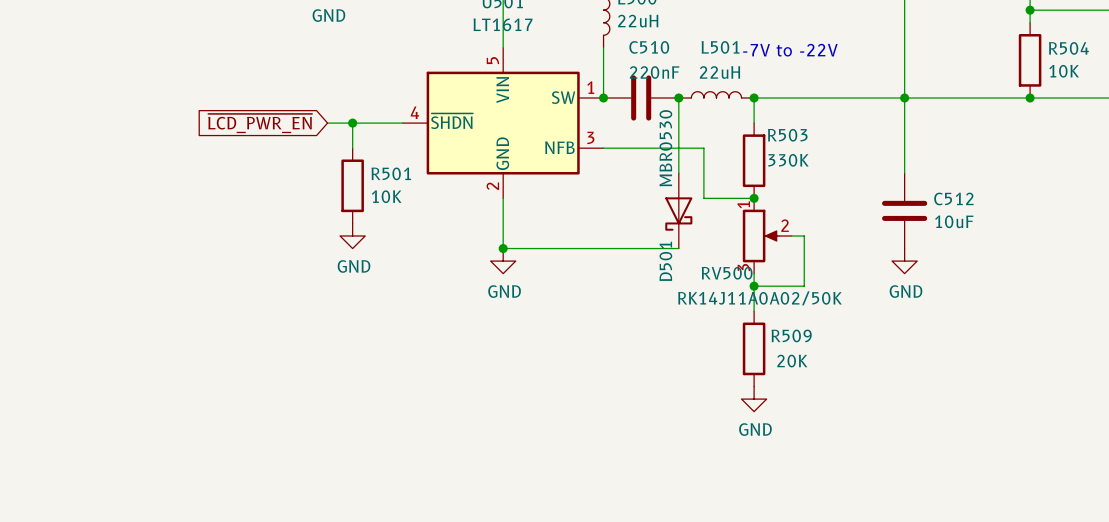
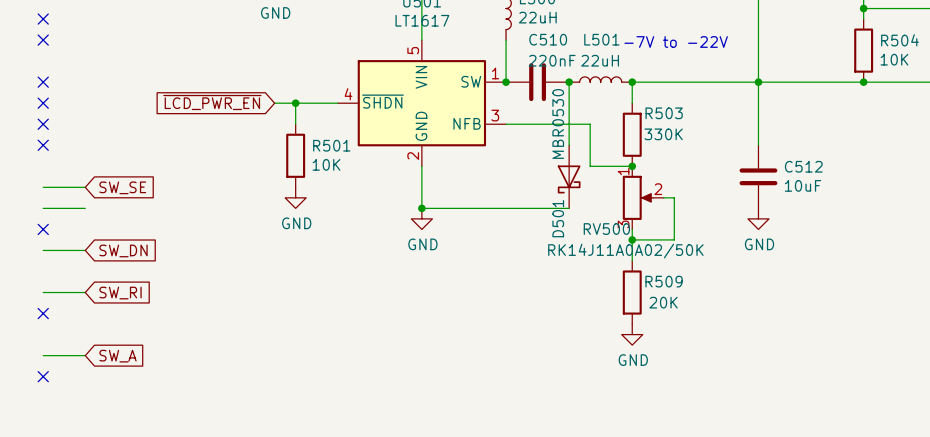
no-connect mark: none -> (43, 19)
no-connect mark: none -> (43, 40)
no-connect mark: none -> (43, 82)
no-connect mark: none -> (43, 103)
no-connect mark: none -> (43, 124)
no-connect mark: none -> (43, 145)
wire: none -> (43, 187) (85, 187)
global label: none -> SW_SE (122, 187)
wire: none -> (43, 208) (85, 208)
no-connect mark: none -> (43, 229)
wire: none -> (43, 250) (85, 250)
global label: none -> SW_DN (123, 250)
wire: none -> (43, 292) (85, 292)
global label: none -> SW_RI (120, 293)
no-connect mark: none -> (43, 313)
wire: none -> (43, 355) (85, 355)
global label: none -> SW_A (118, 356)
no-connect mark: none -> (43, 376)

